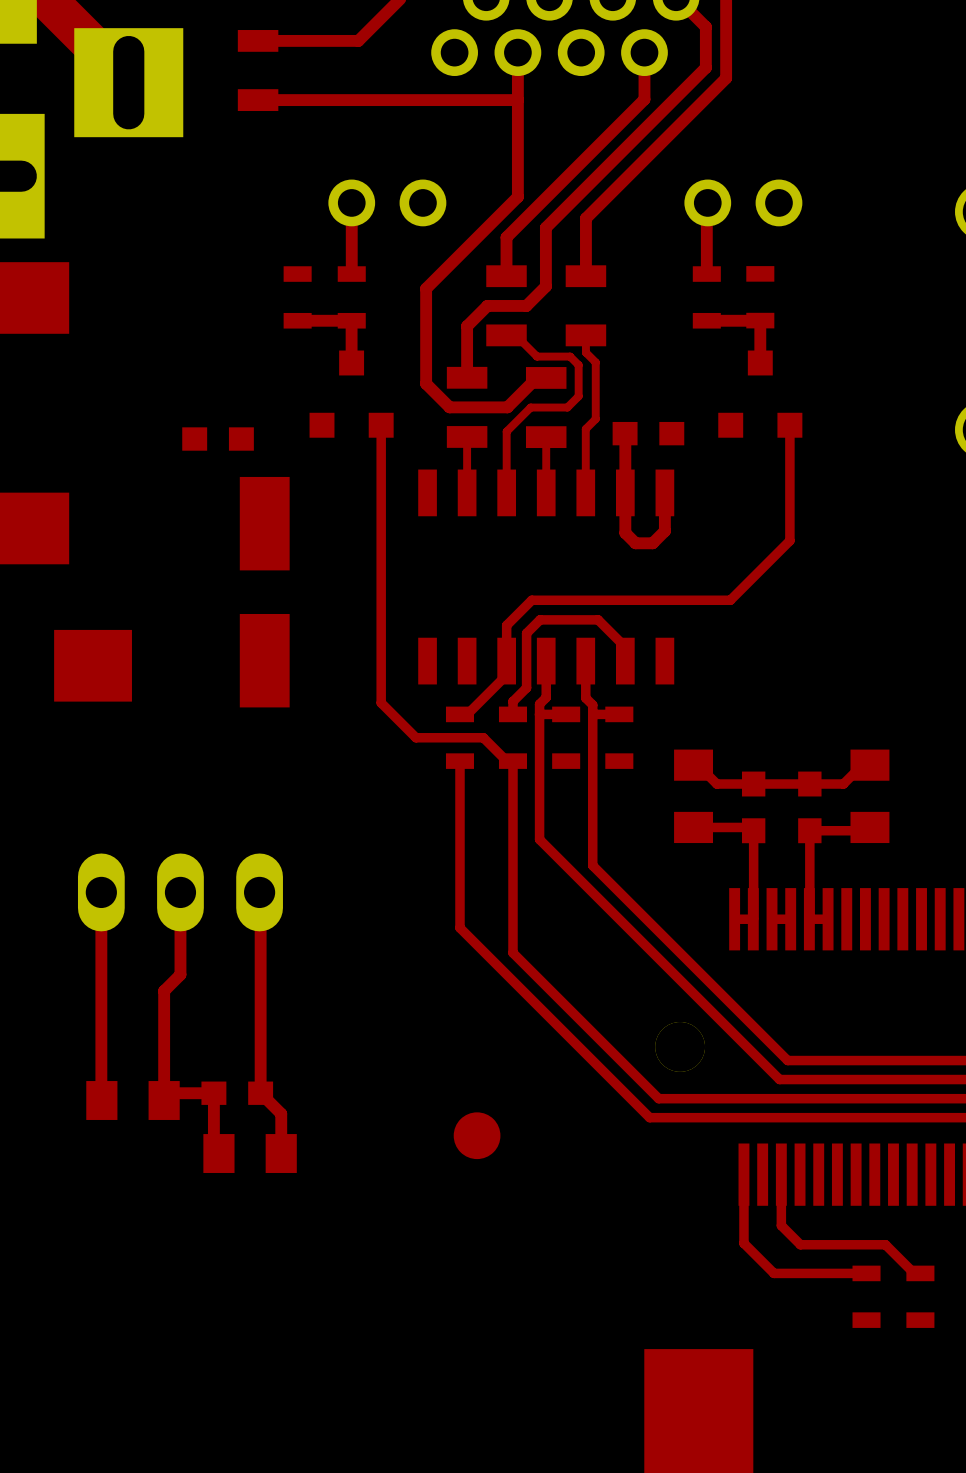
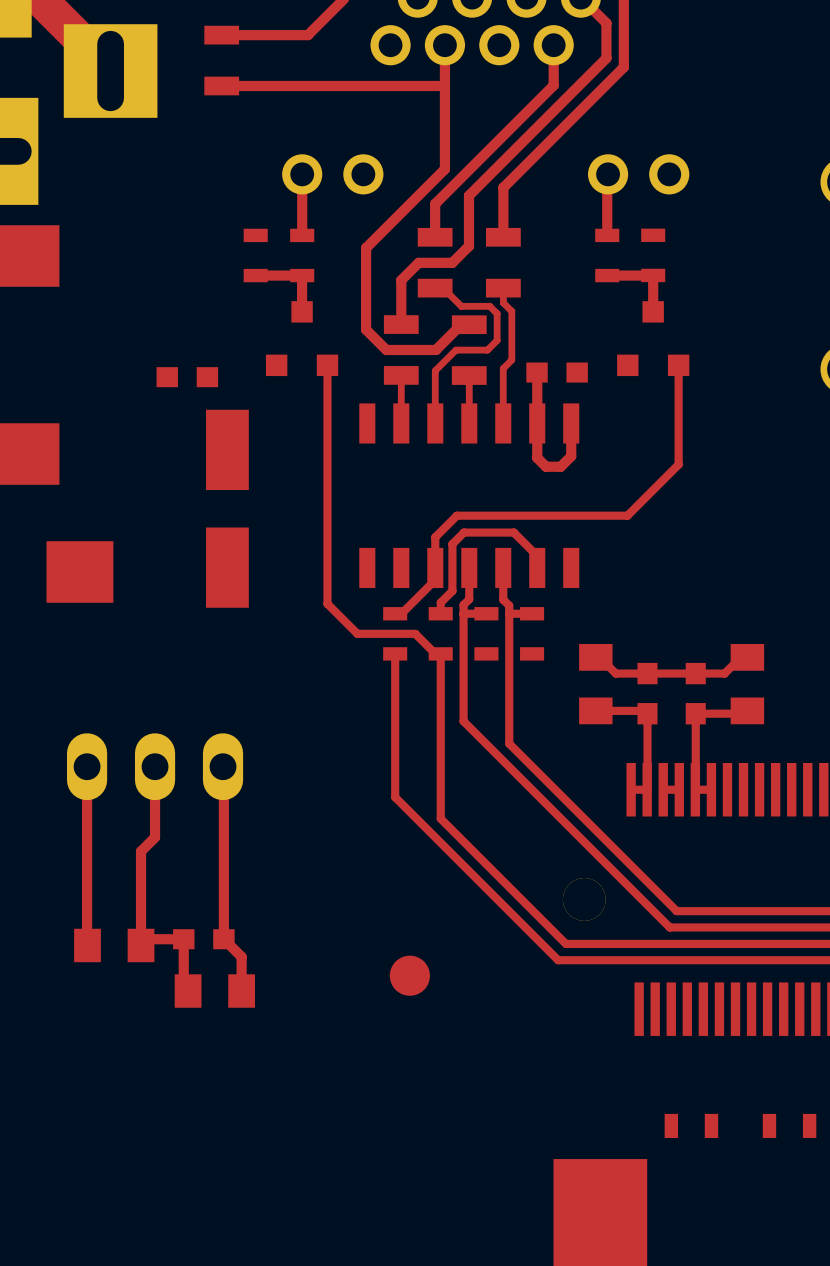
top track: (743, 1174) (743, 1243) (774, 1273) (866, 1273) -> none
top track: (781, 1174) (781, 1225) (800, 1244) (885, 1244) (914, 1273) (920, 1273) -> none
part rotation: 0° (866, 1296) -> 90° clockwise (691, 1125)
part position: (866, 1296) -> (691, 1125)
part rotation: 0° (920, 1296) -> 90° clockwise (789, 1125)

